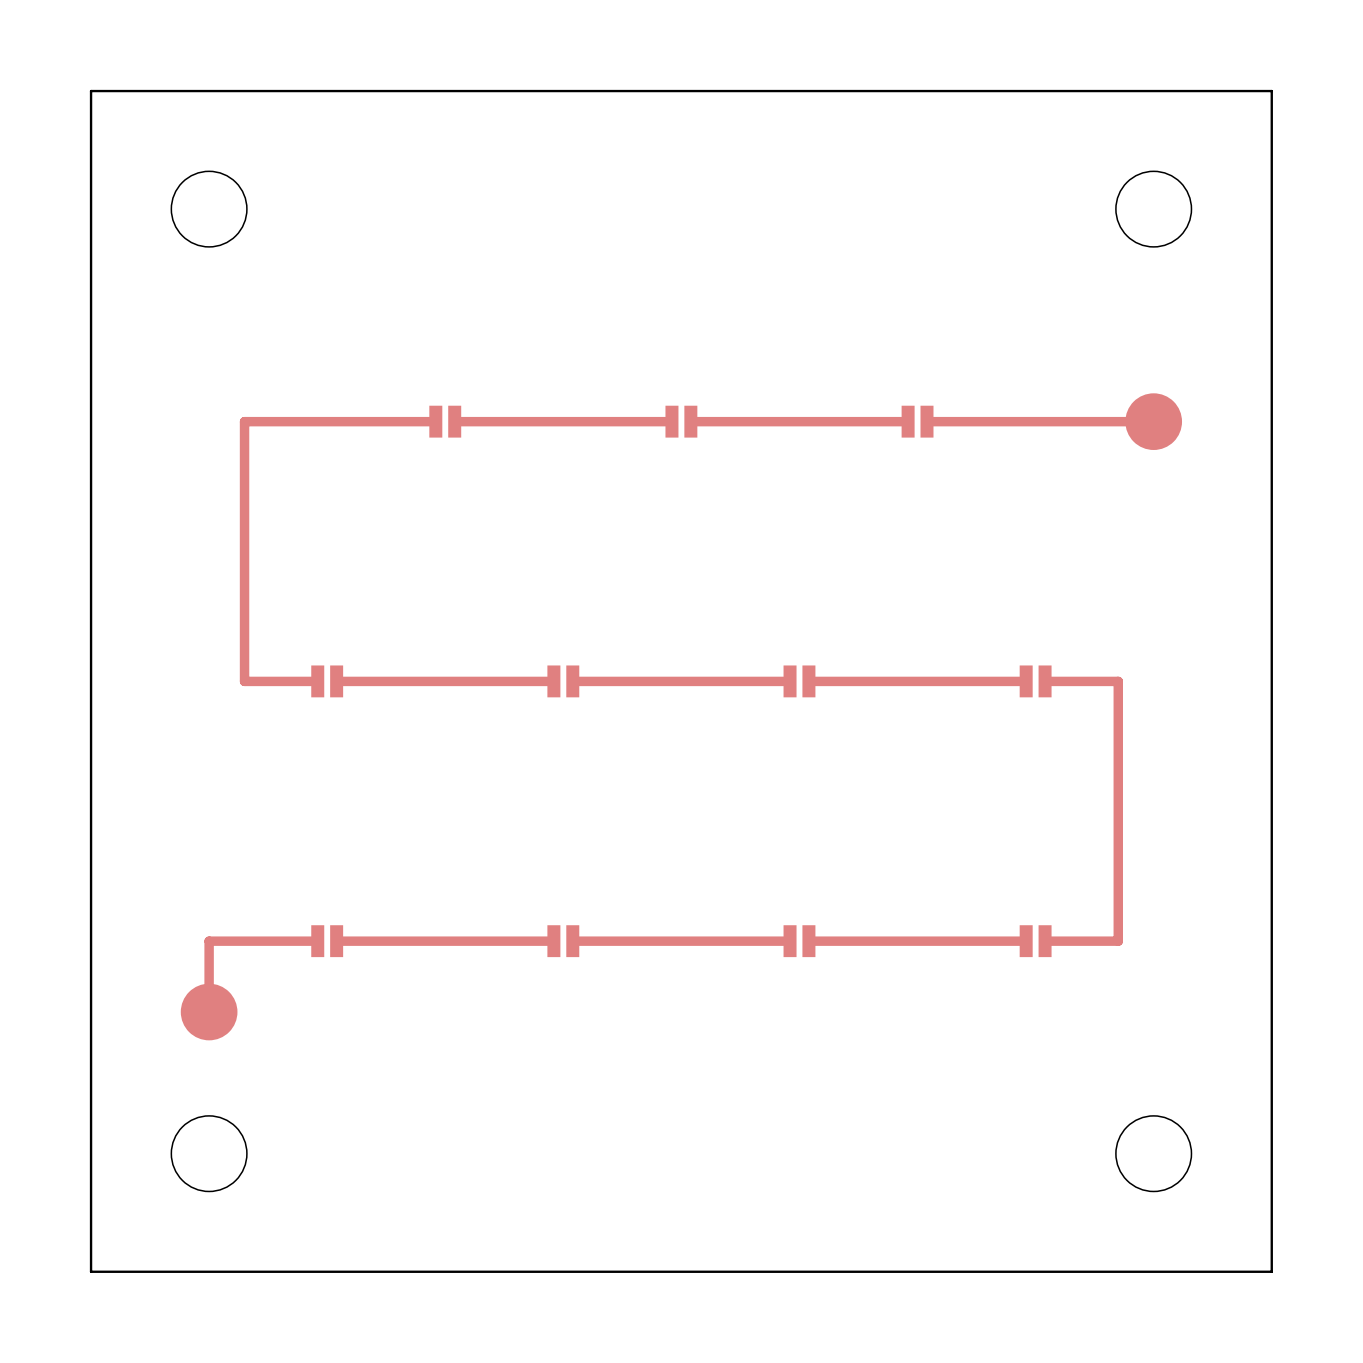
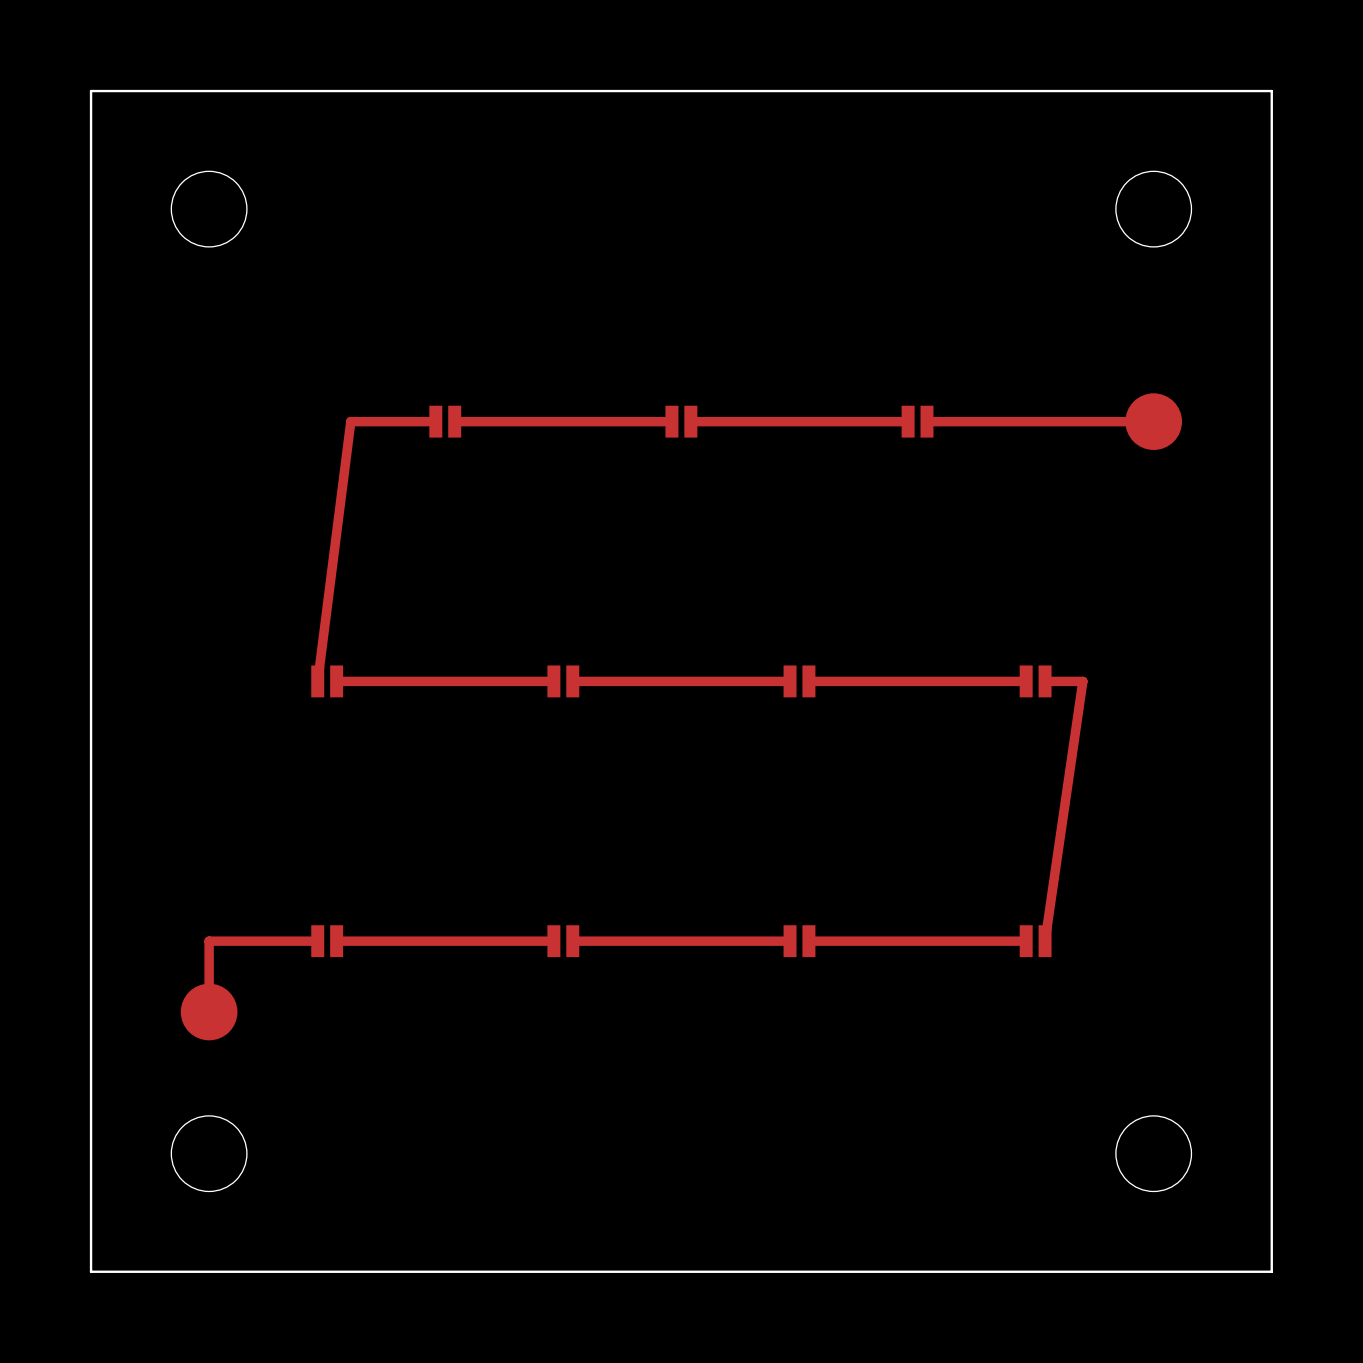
top track: (350, 421) (244, 421) (244, 681) (317, 681) -> (350, 421) (317, 681)
top track: (1082, 681) (1118, 681) (1118, 941) (1045, 941) -> (1082, 681) (1045, 941)

